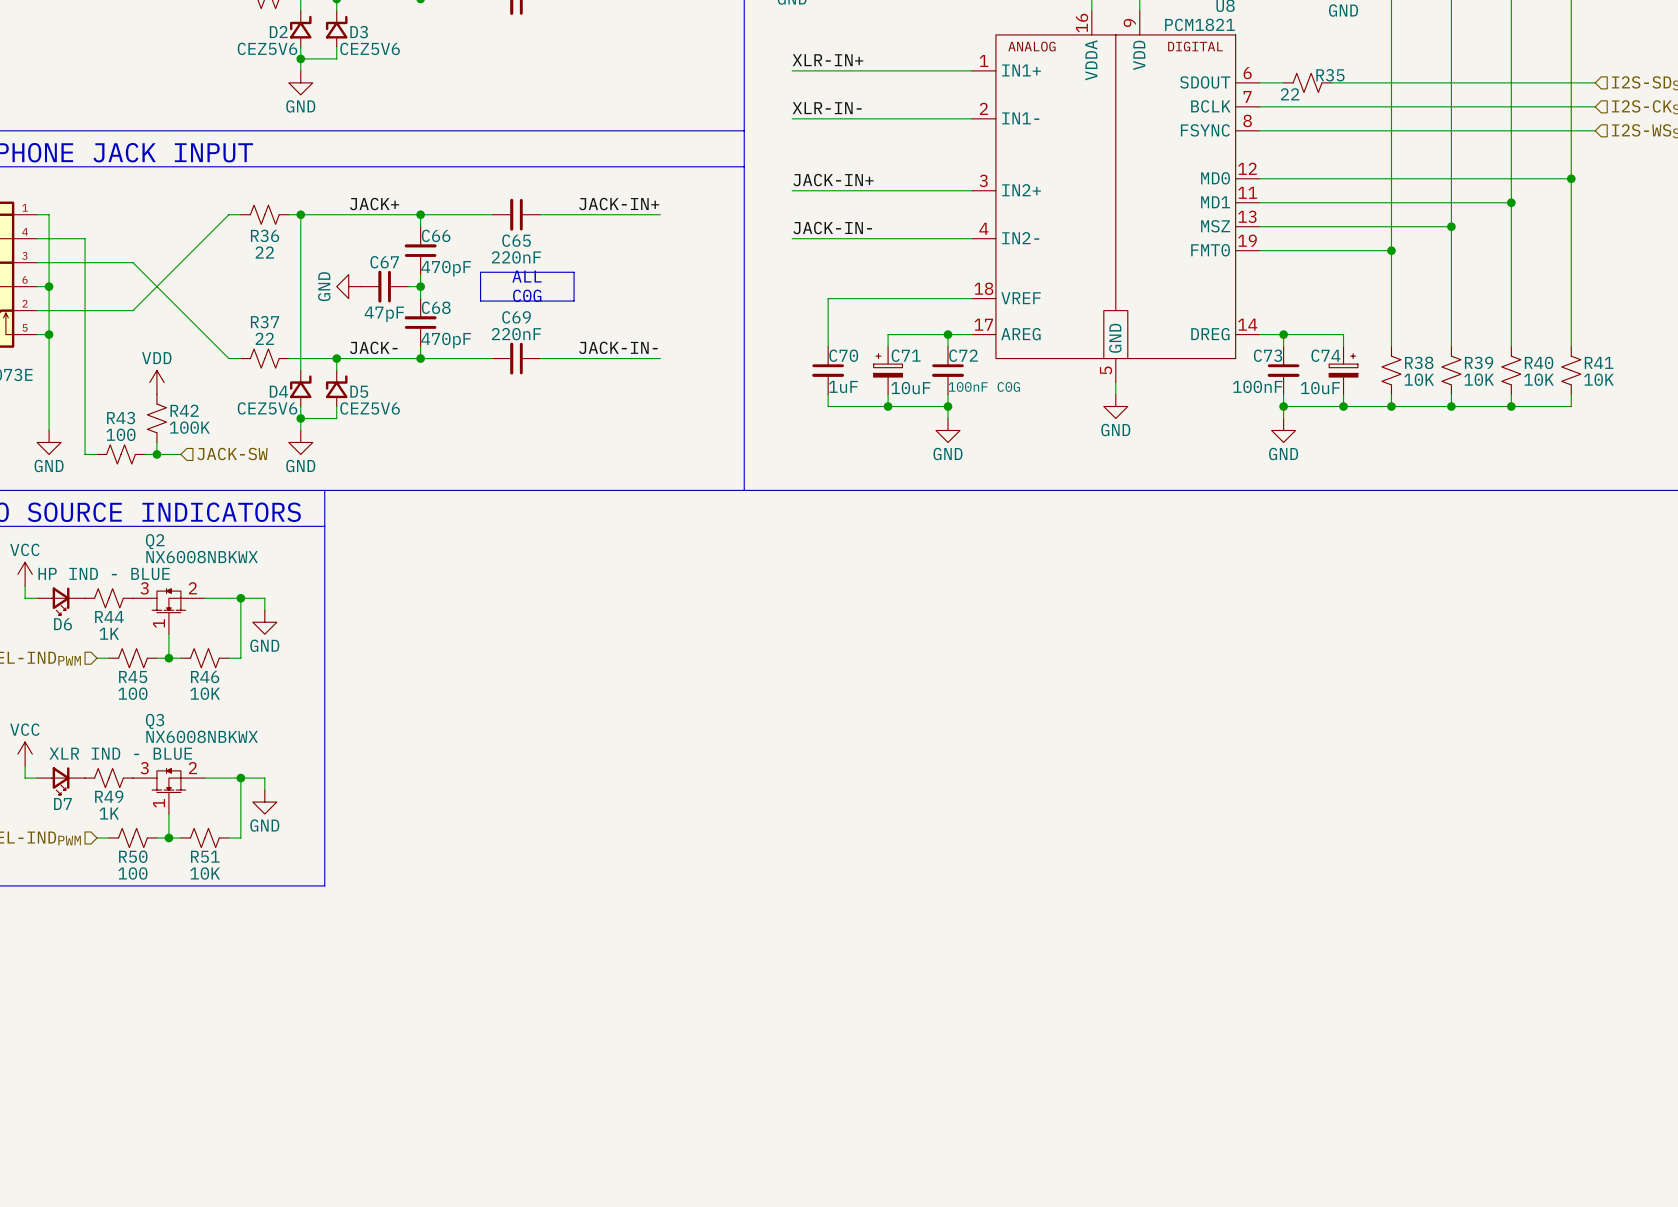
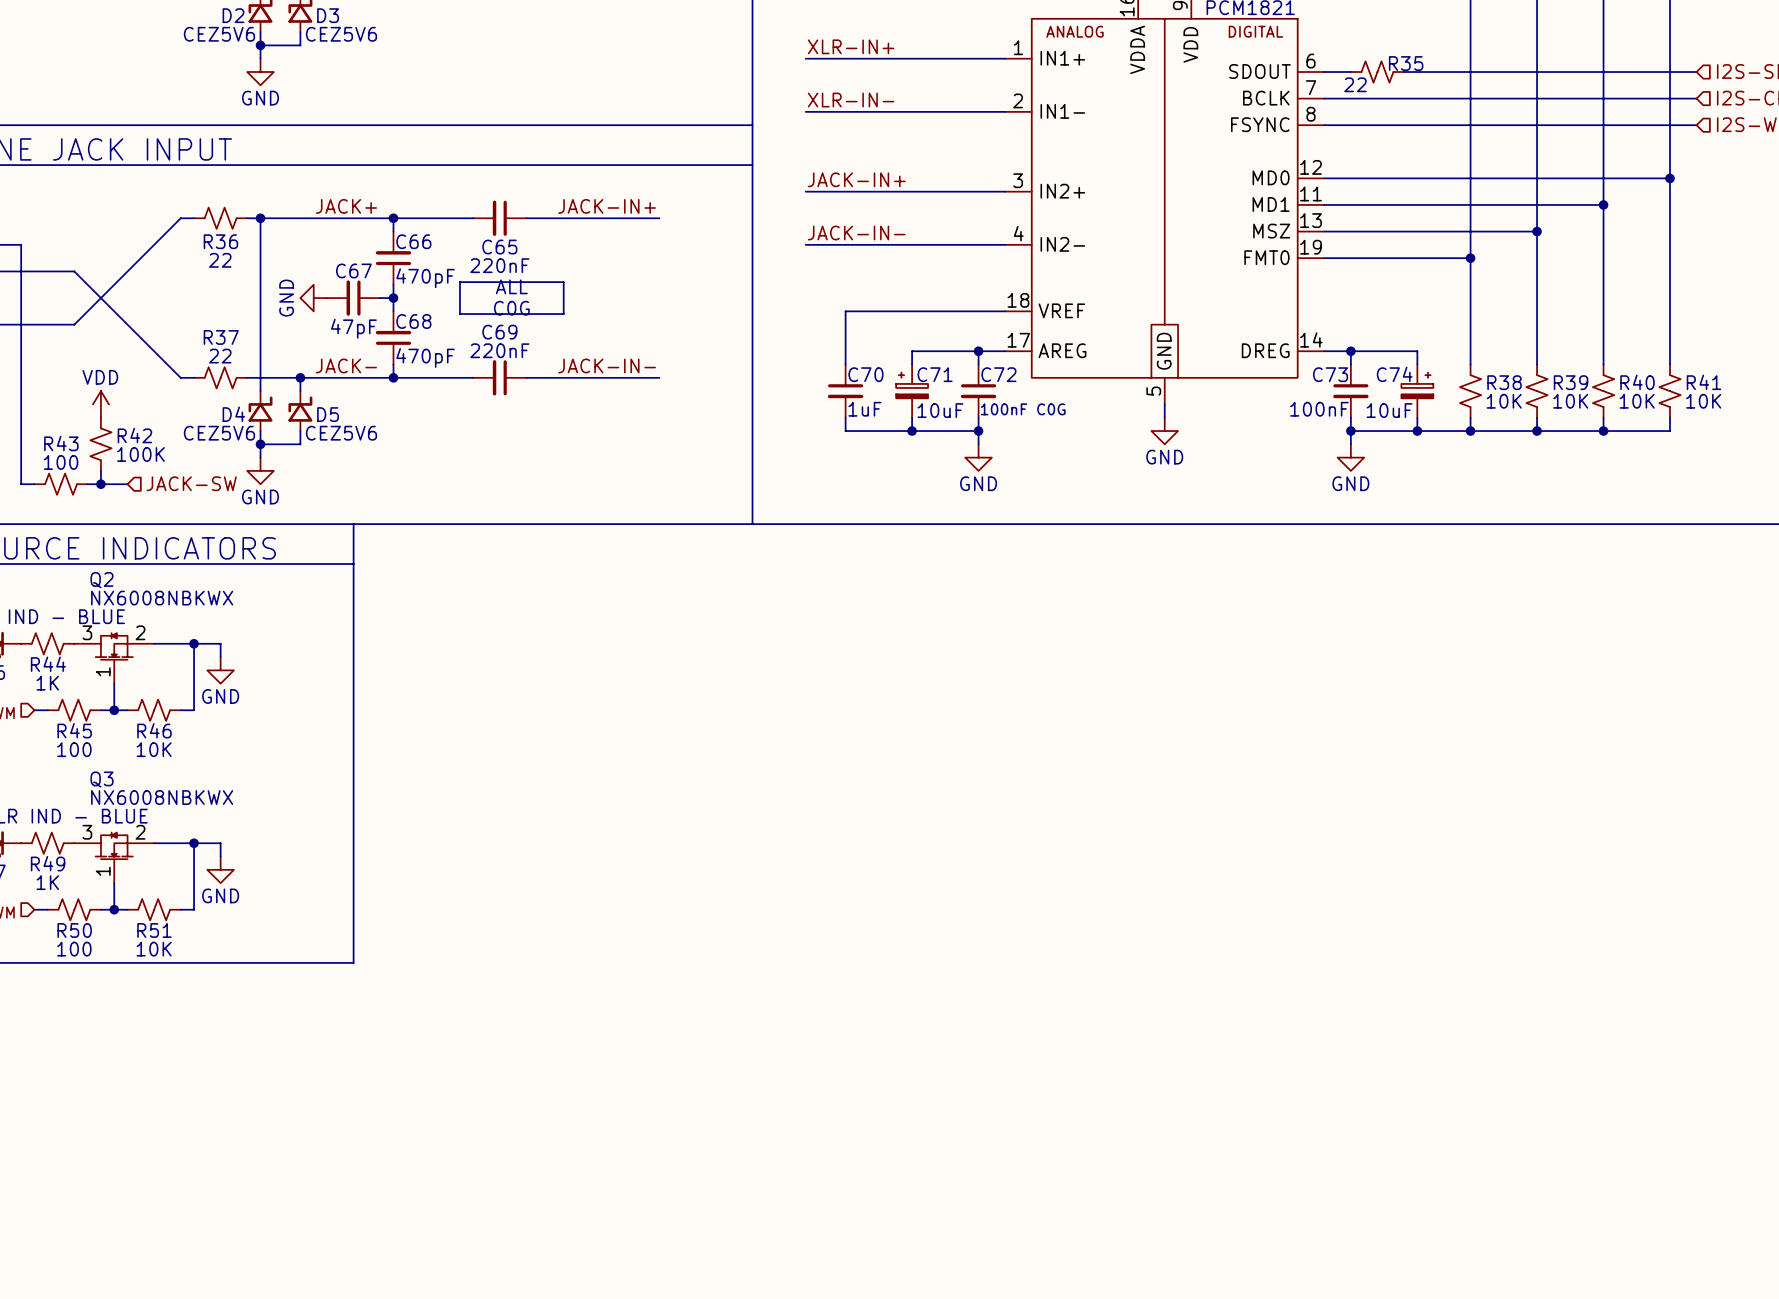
line: (324, 490) (324, 885) -> (353, 524) (353, 962) (287, 962)
line: none -> (287, 564) (353, 564)

